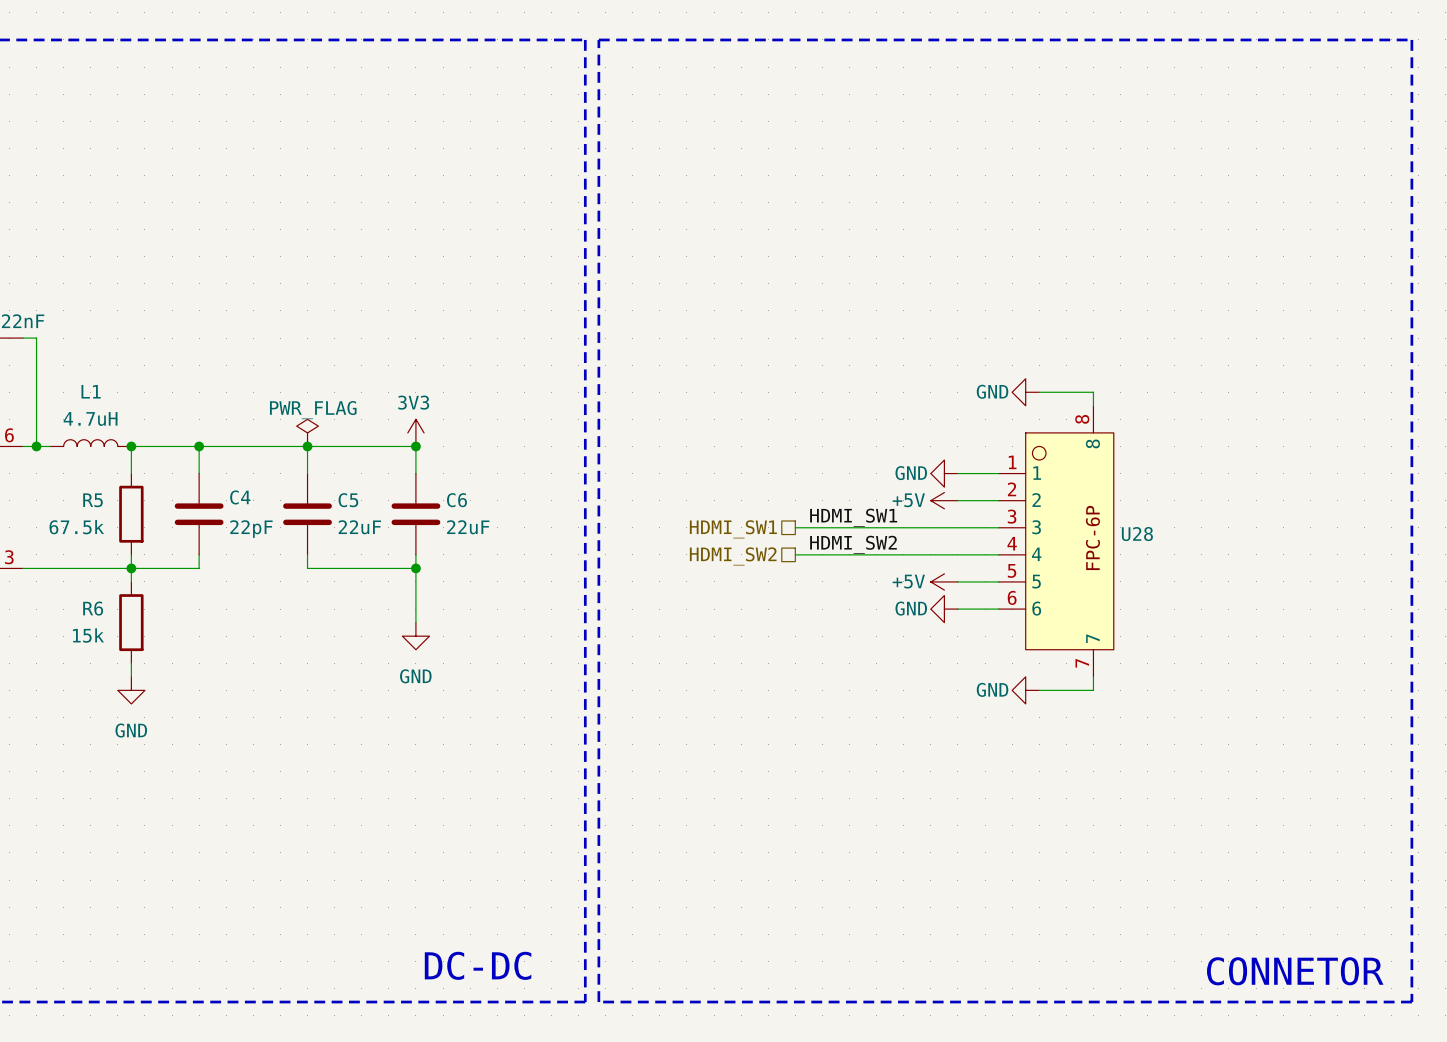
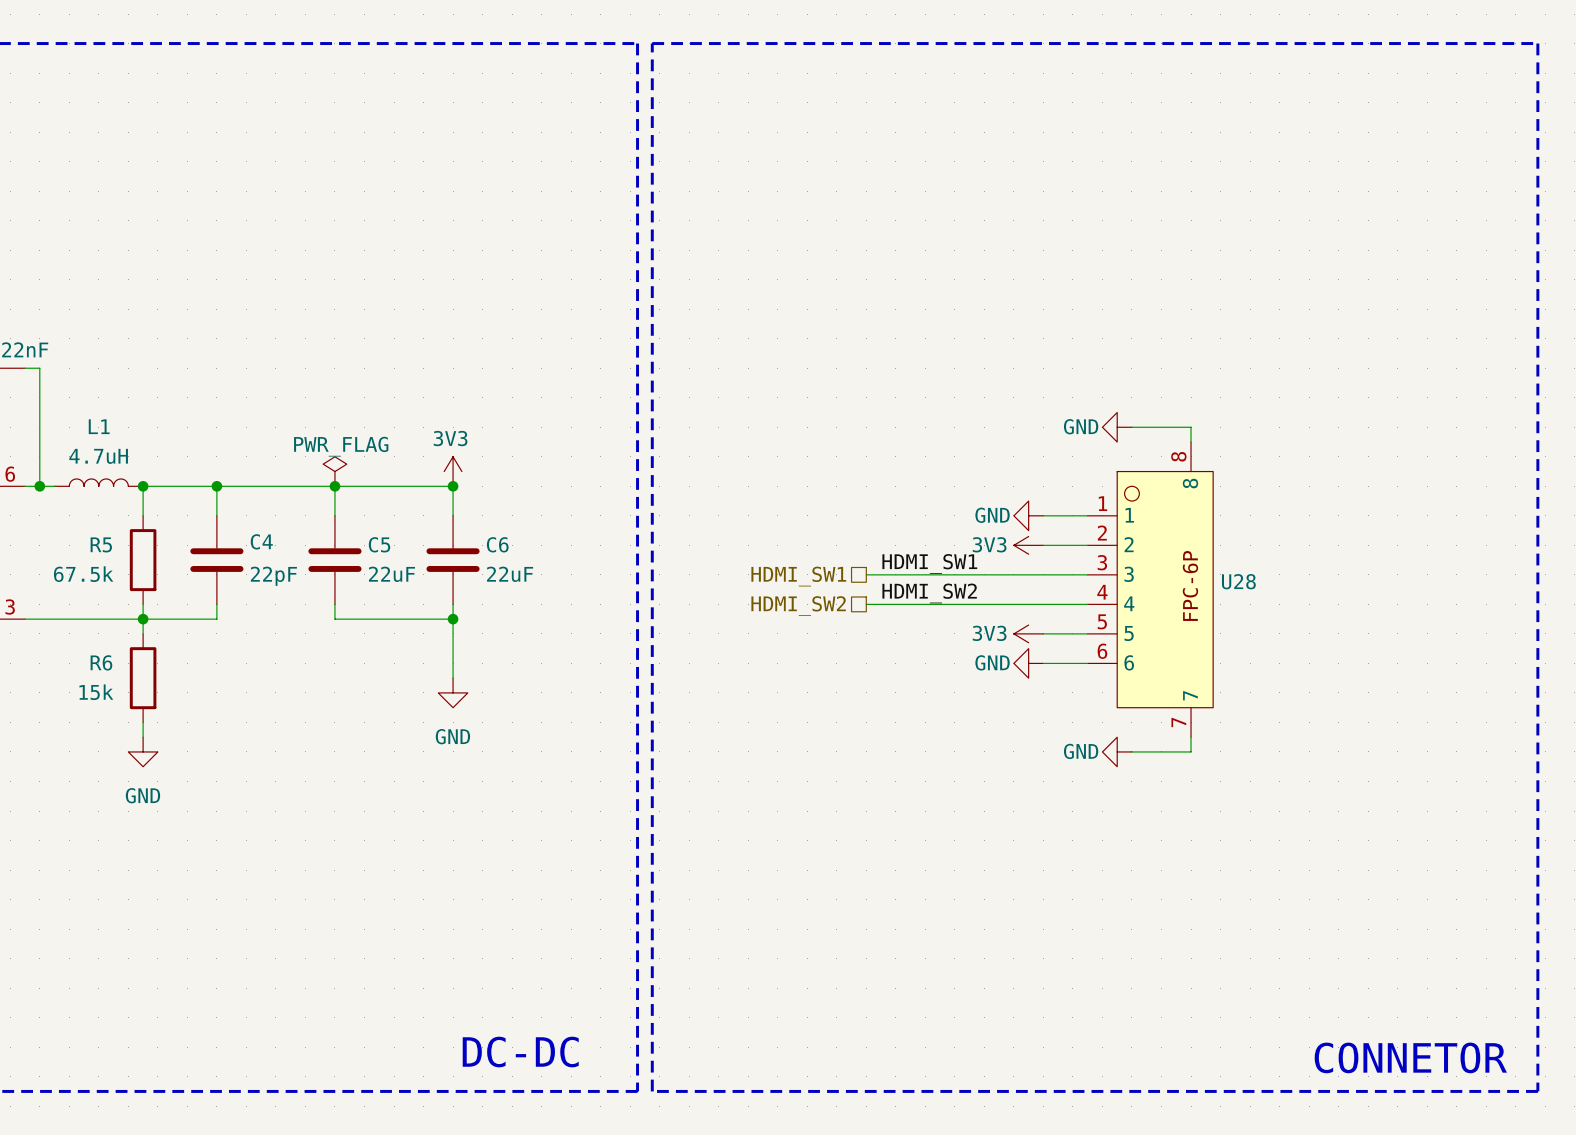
power symbol: +5V (944, 500) -> 3V3 (1028, 545)
power symbol: +5V (944, 581) -> 3V3 (1028, 633)

